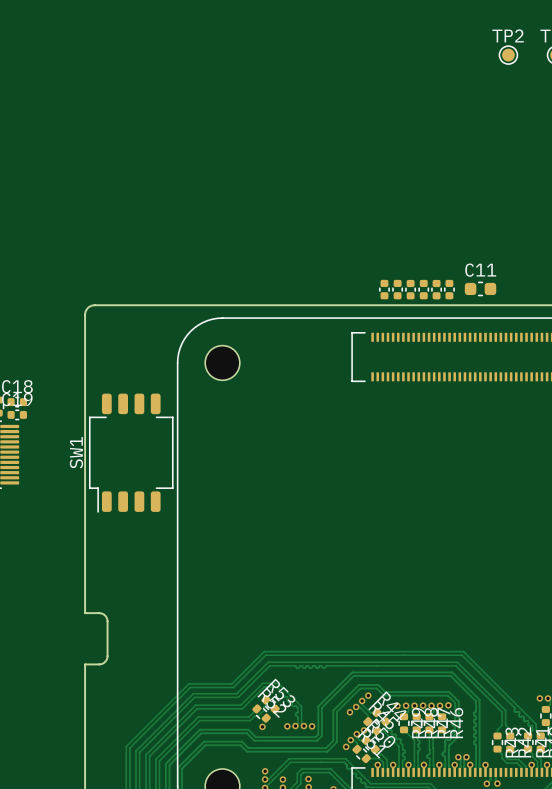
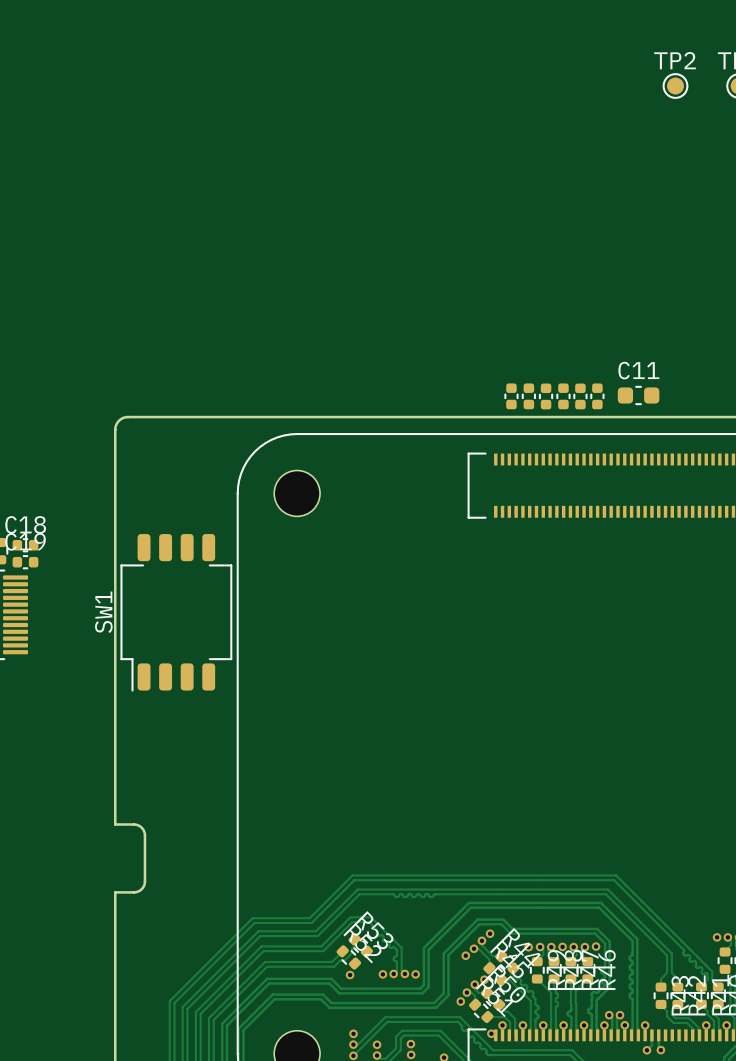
via: none -> (491, 1033)

